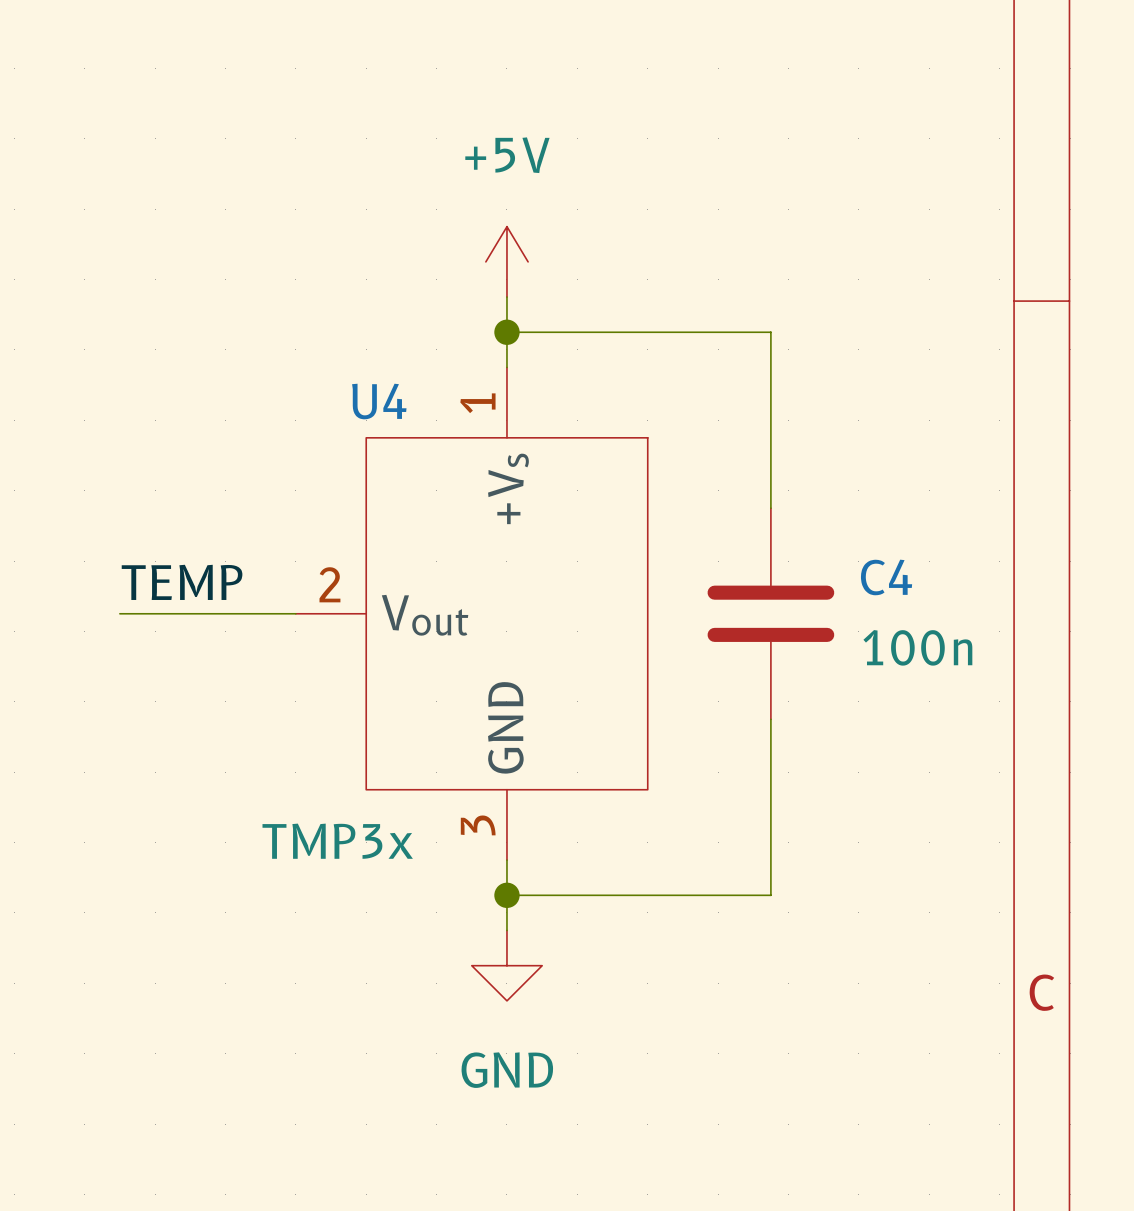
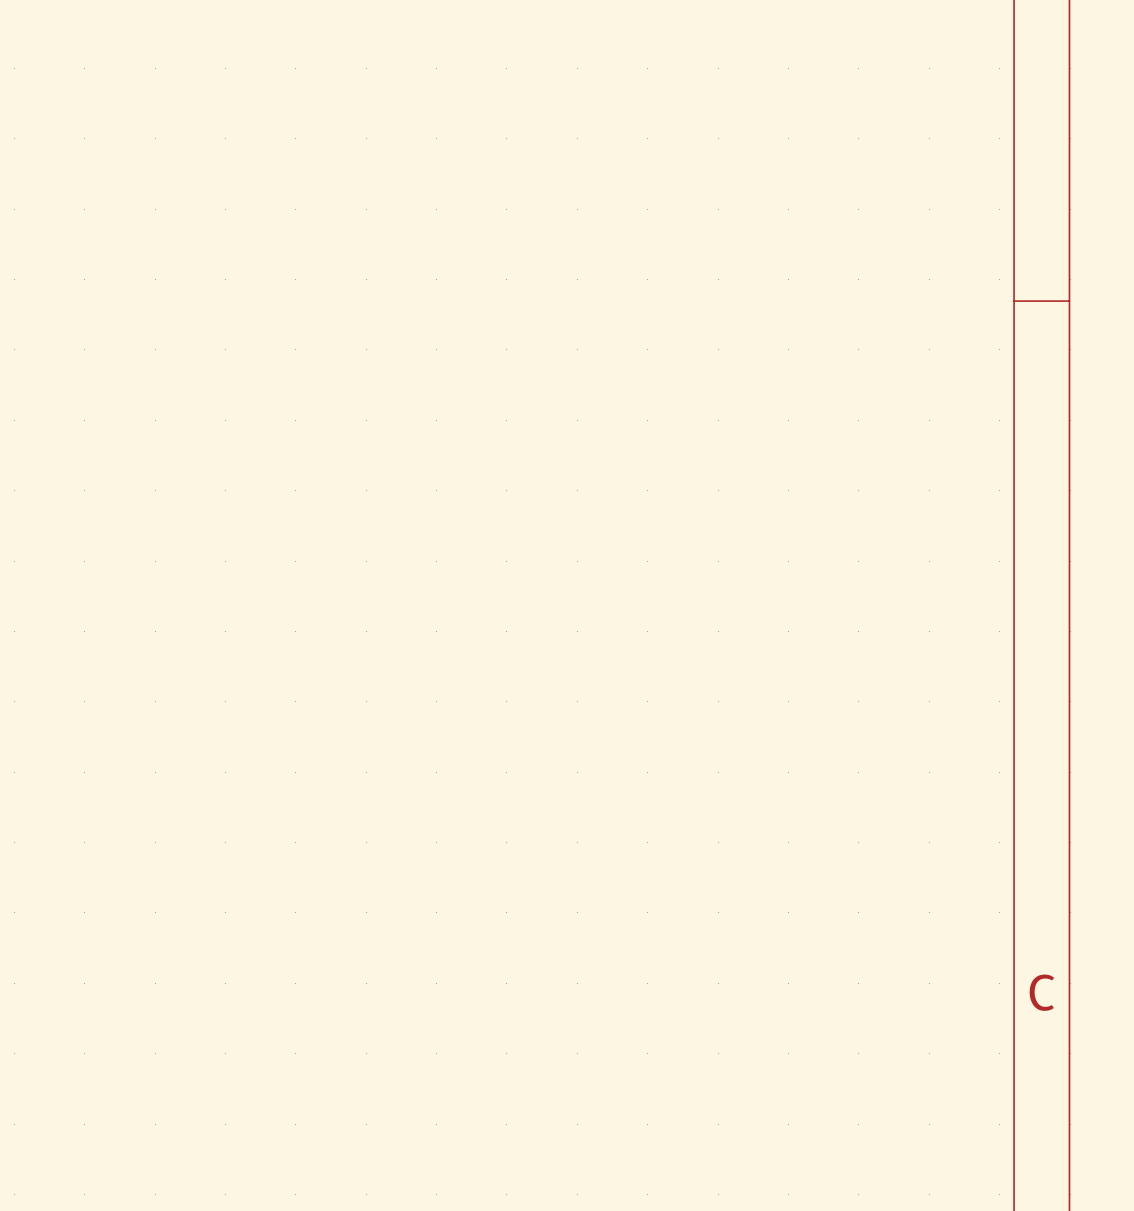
power symbol: +5V (506, 261) -> none
wire: (506, 297) (506, 367) -> none
wire: (506, 332) (770, 332) (770, 508) -> none
junction: (506, 332) -> none
label: TEMP (182, 582) -> none
wire: (119, 613) (295, 613) -> none
U4: TMP3x (471, 613) -> none
C4: 100n (770, 613) -> none
wire: (770, 719) (770, 895) (506, 895) -> none
wire: (506, 860) (506, 930) -> none
junction: (506, 895) -> none
power symbol: GND (506, 965) -> none

